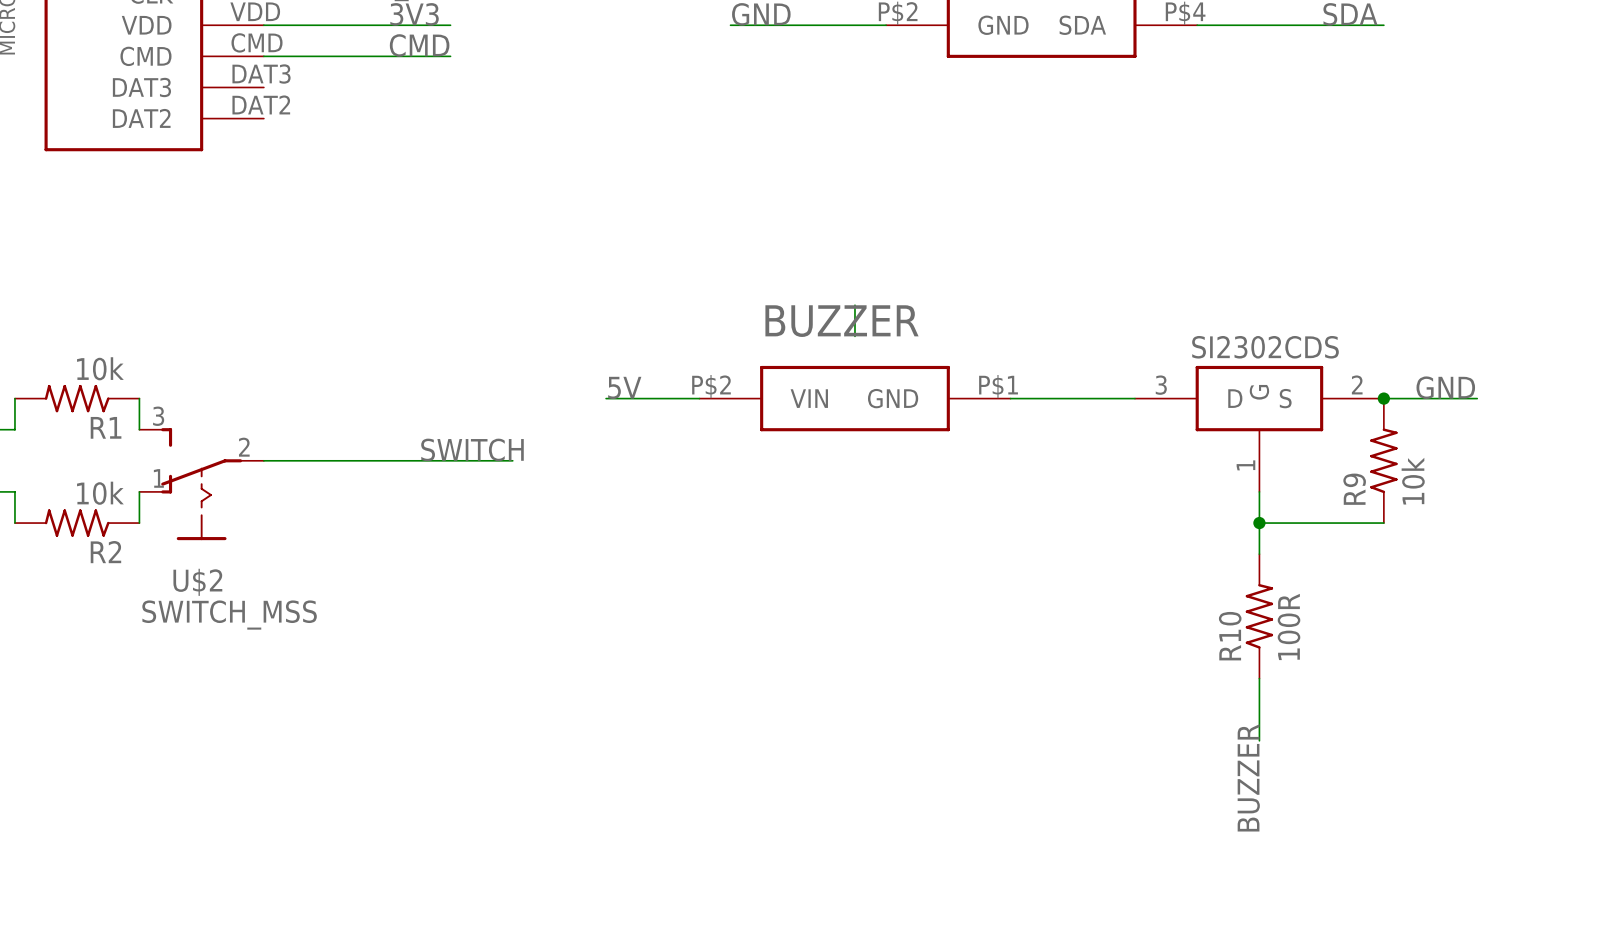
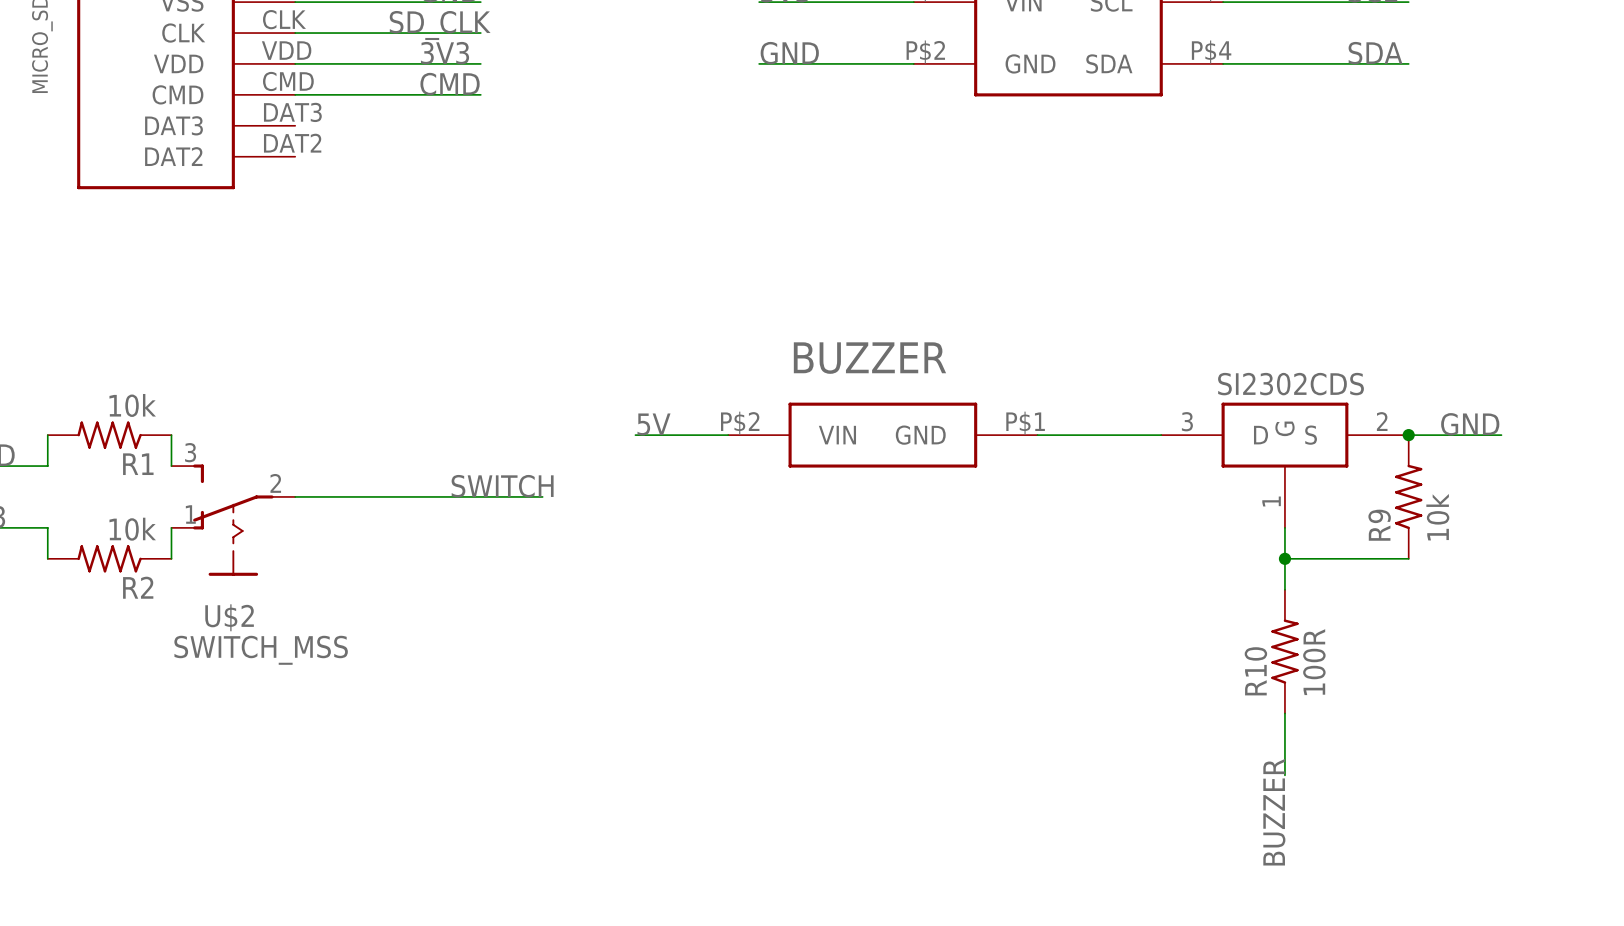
wire: (854, 305) (854, 336) -> none

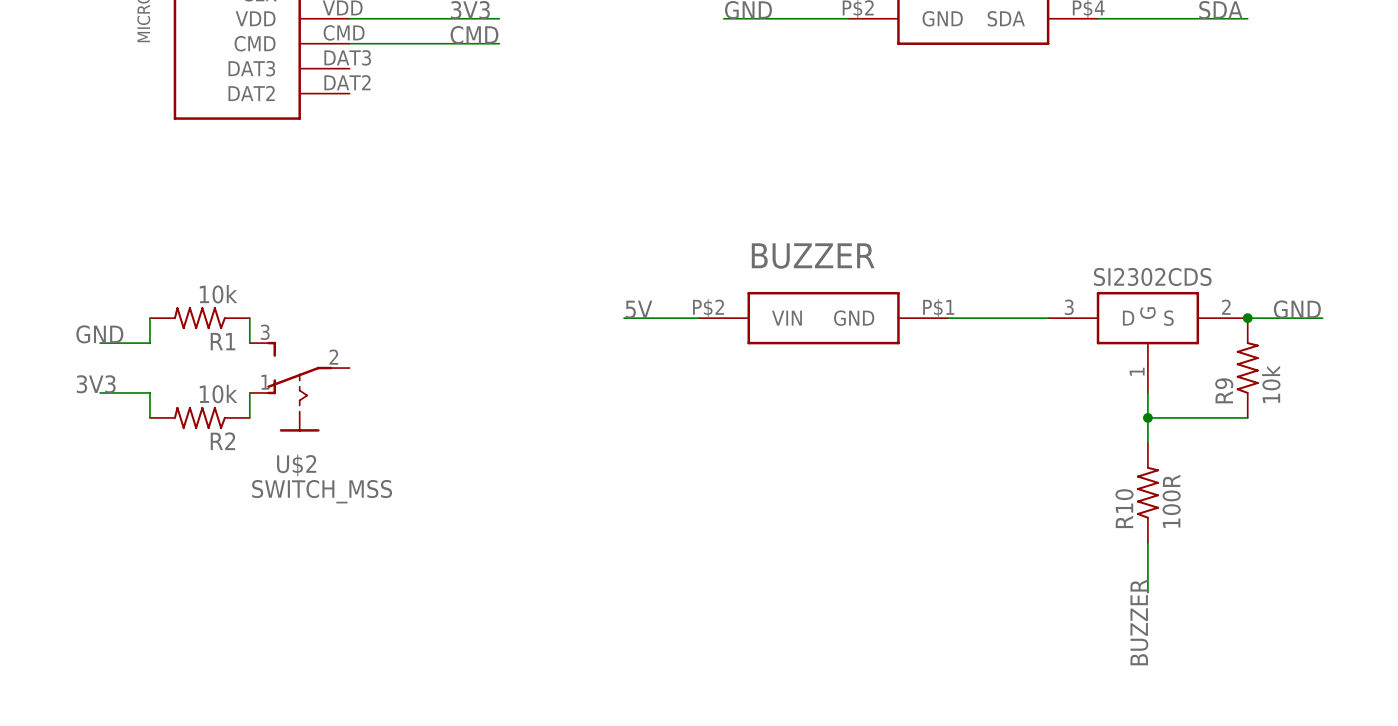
label: SWITCH (502, 486) -> none
wire: (295, 496) (542, 496) -> none

